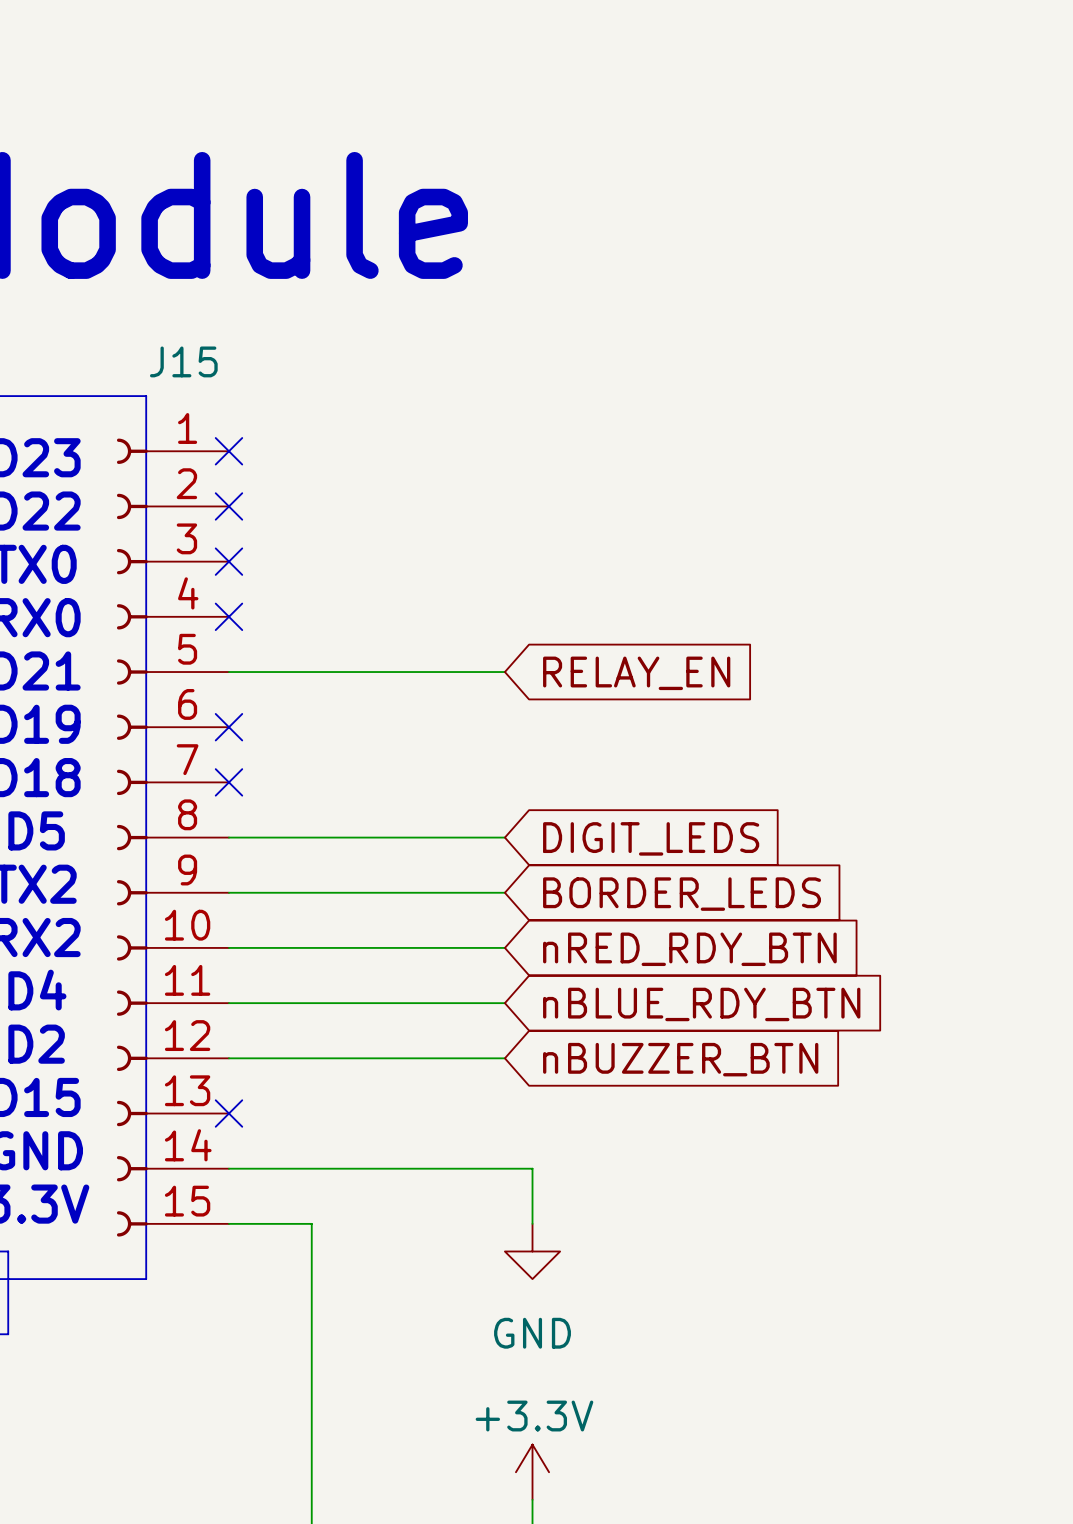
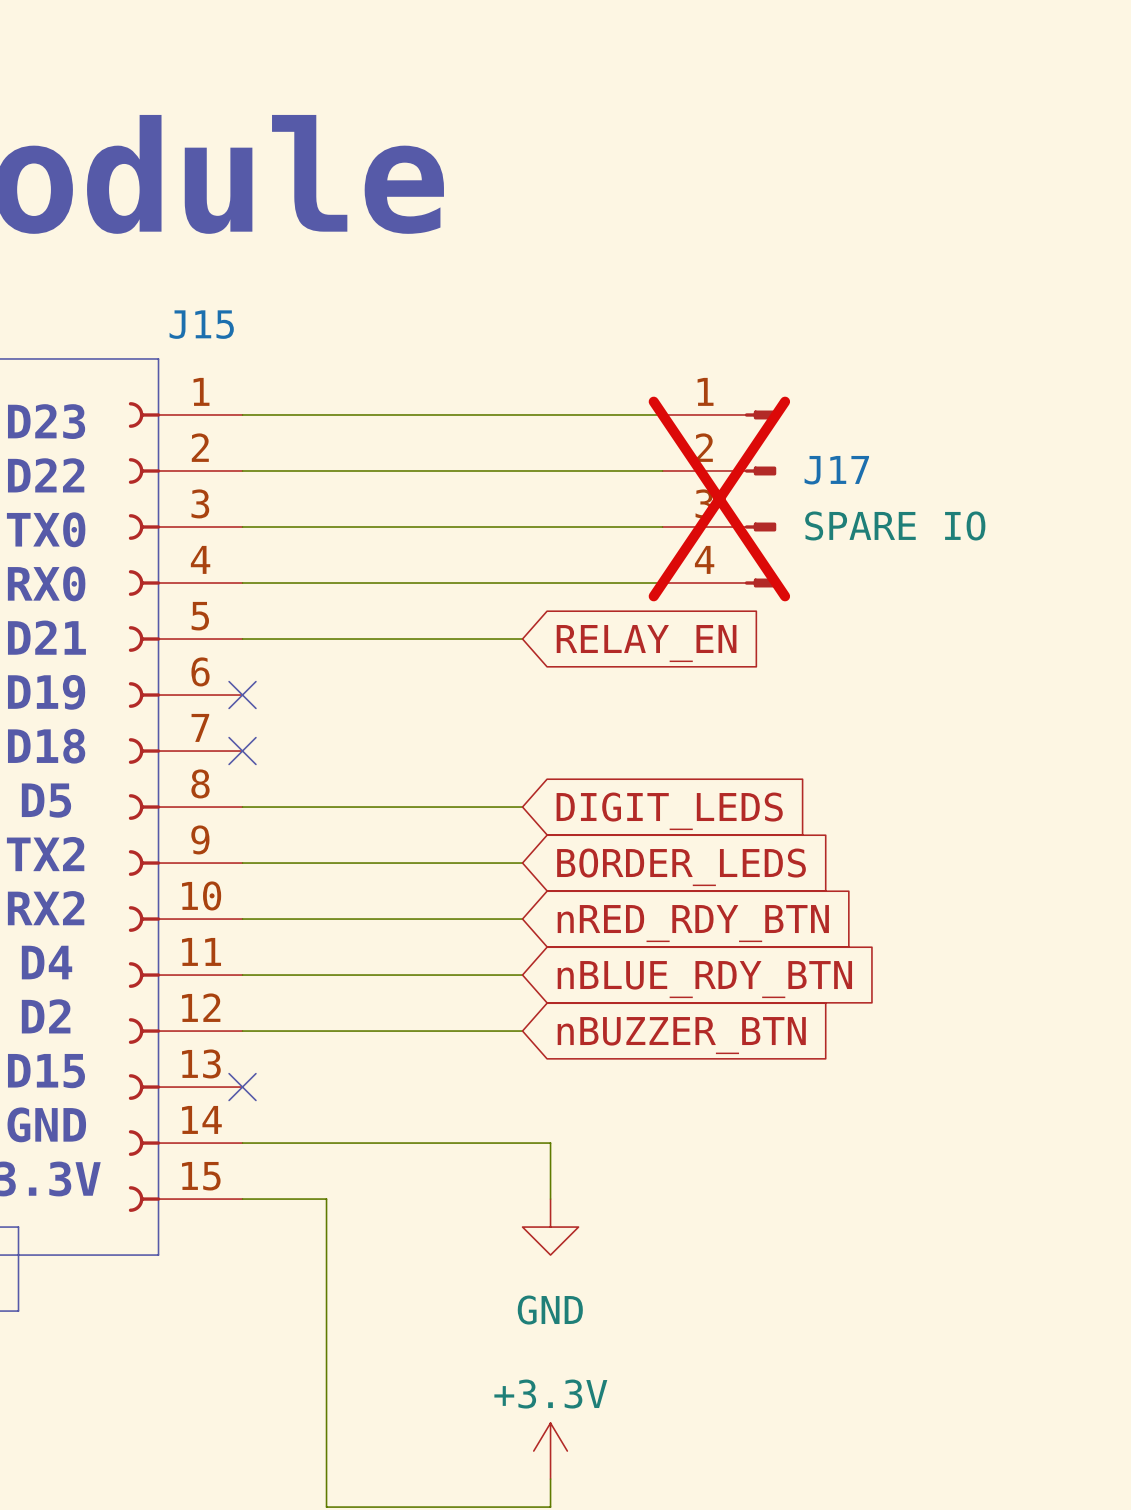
wire: none -> (242, 414) (662, 414)
no-connect mark: (228, 451) -> none
wire: none -> (242, 470) (662, 470)
no-connect mark: (228, 506) -> none
J17: none -> SPARE IO (719, 499)
wire: none -> (242, 527) (662, 527)
no-connect mark: (228, 561) -> none
wire: none -> (242, 583) (662, 583)
no-connect mark: (228, 616) -> none

